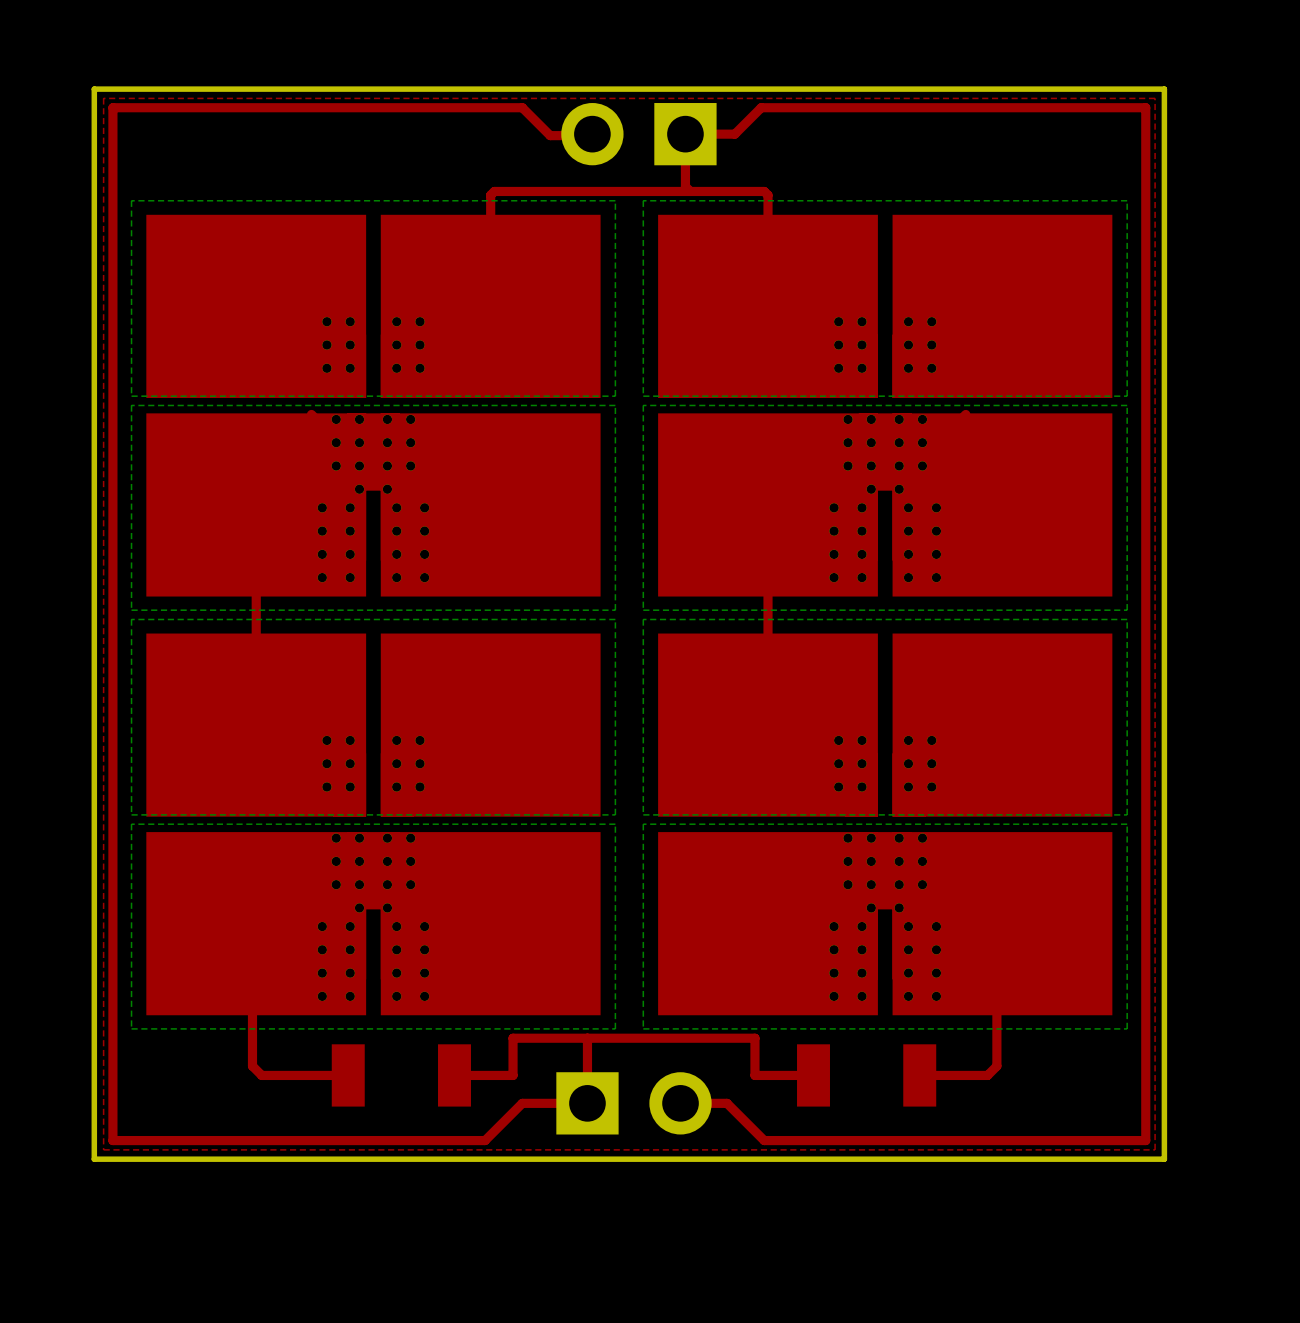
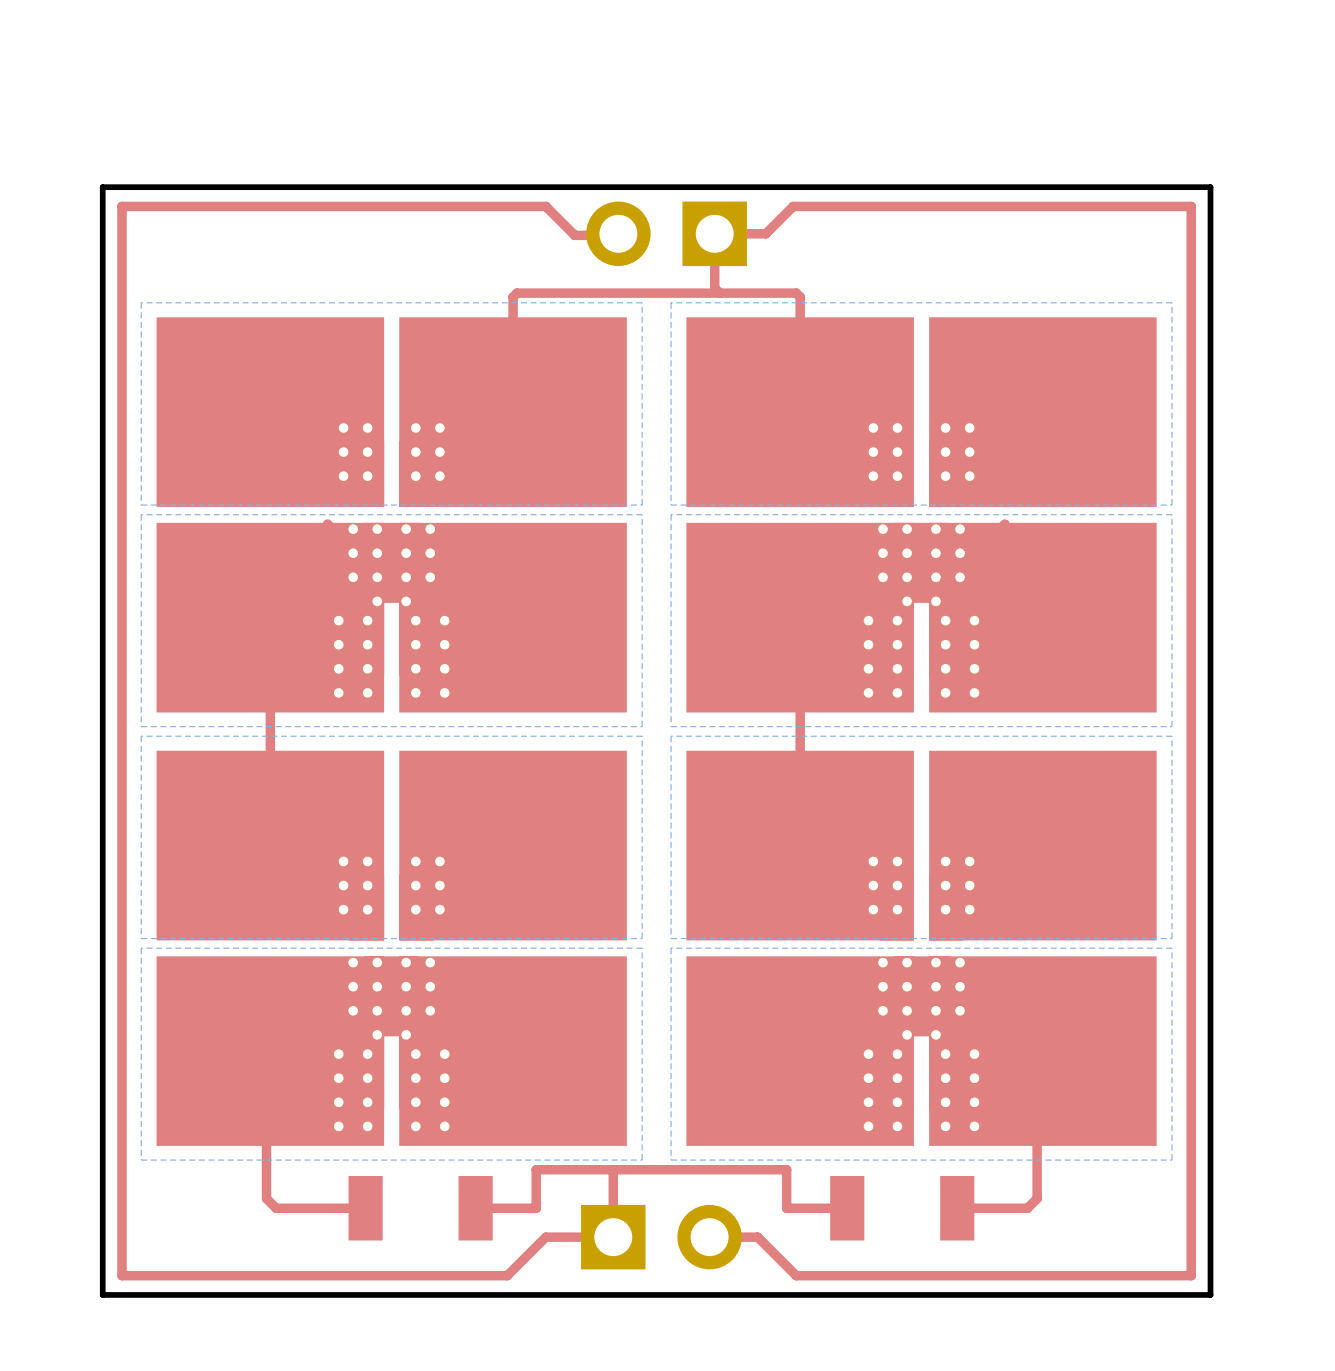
top zone outline: (1155, 98) (1155, 1149) (103, 1149) (103, 98) (1155, 98) -> none

